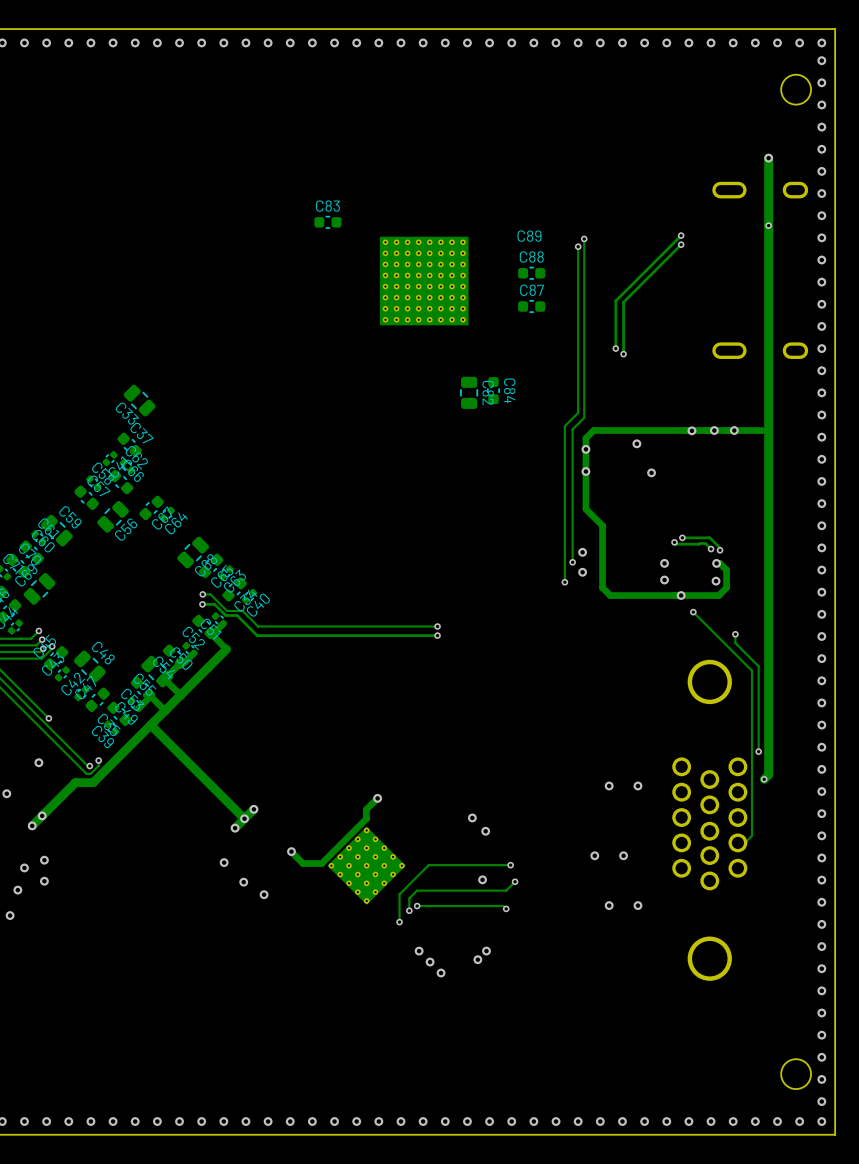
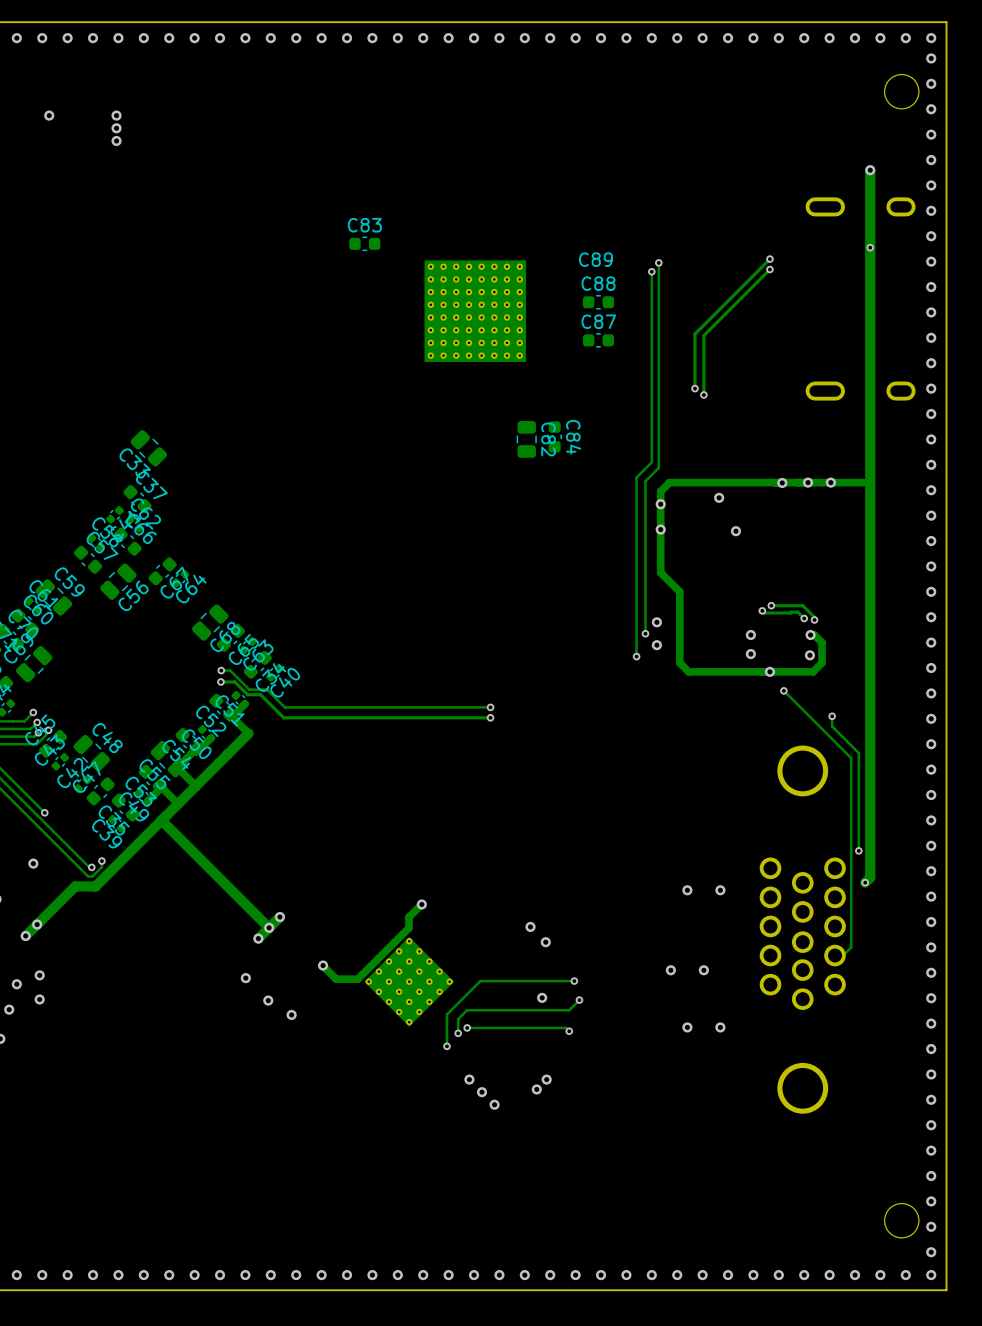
via: none -> (49, 115)
via: none -> (116, 115)
via: none -> (116, 128)
via: none -> (116, 140)

